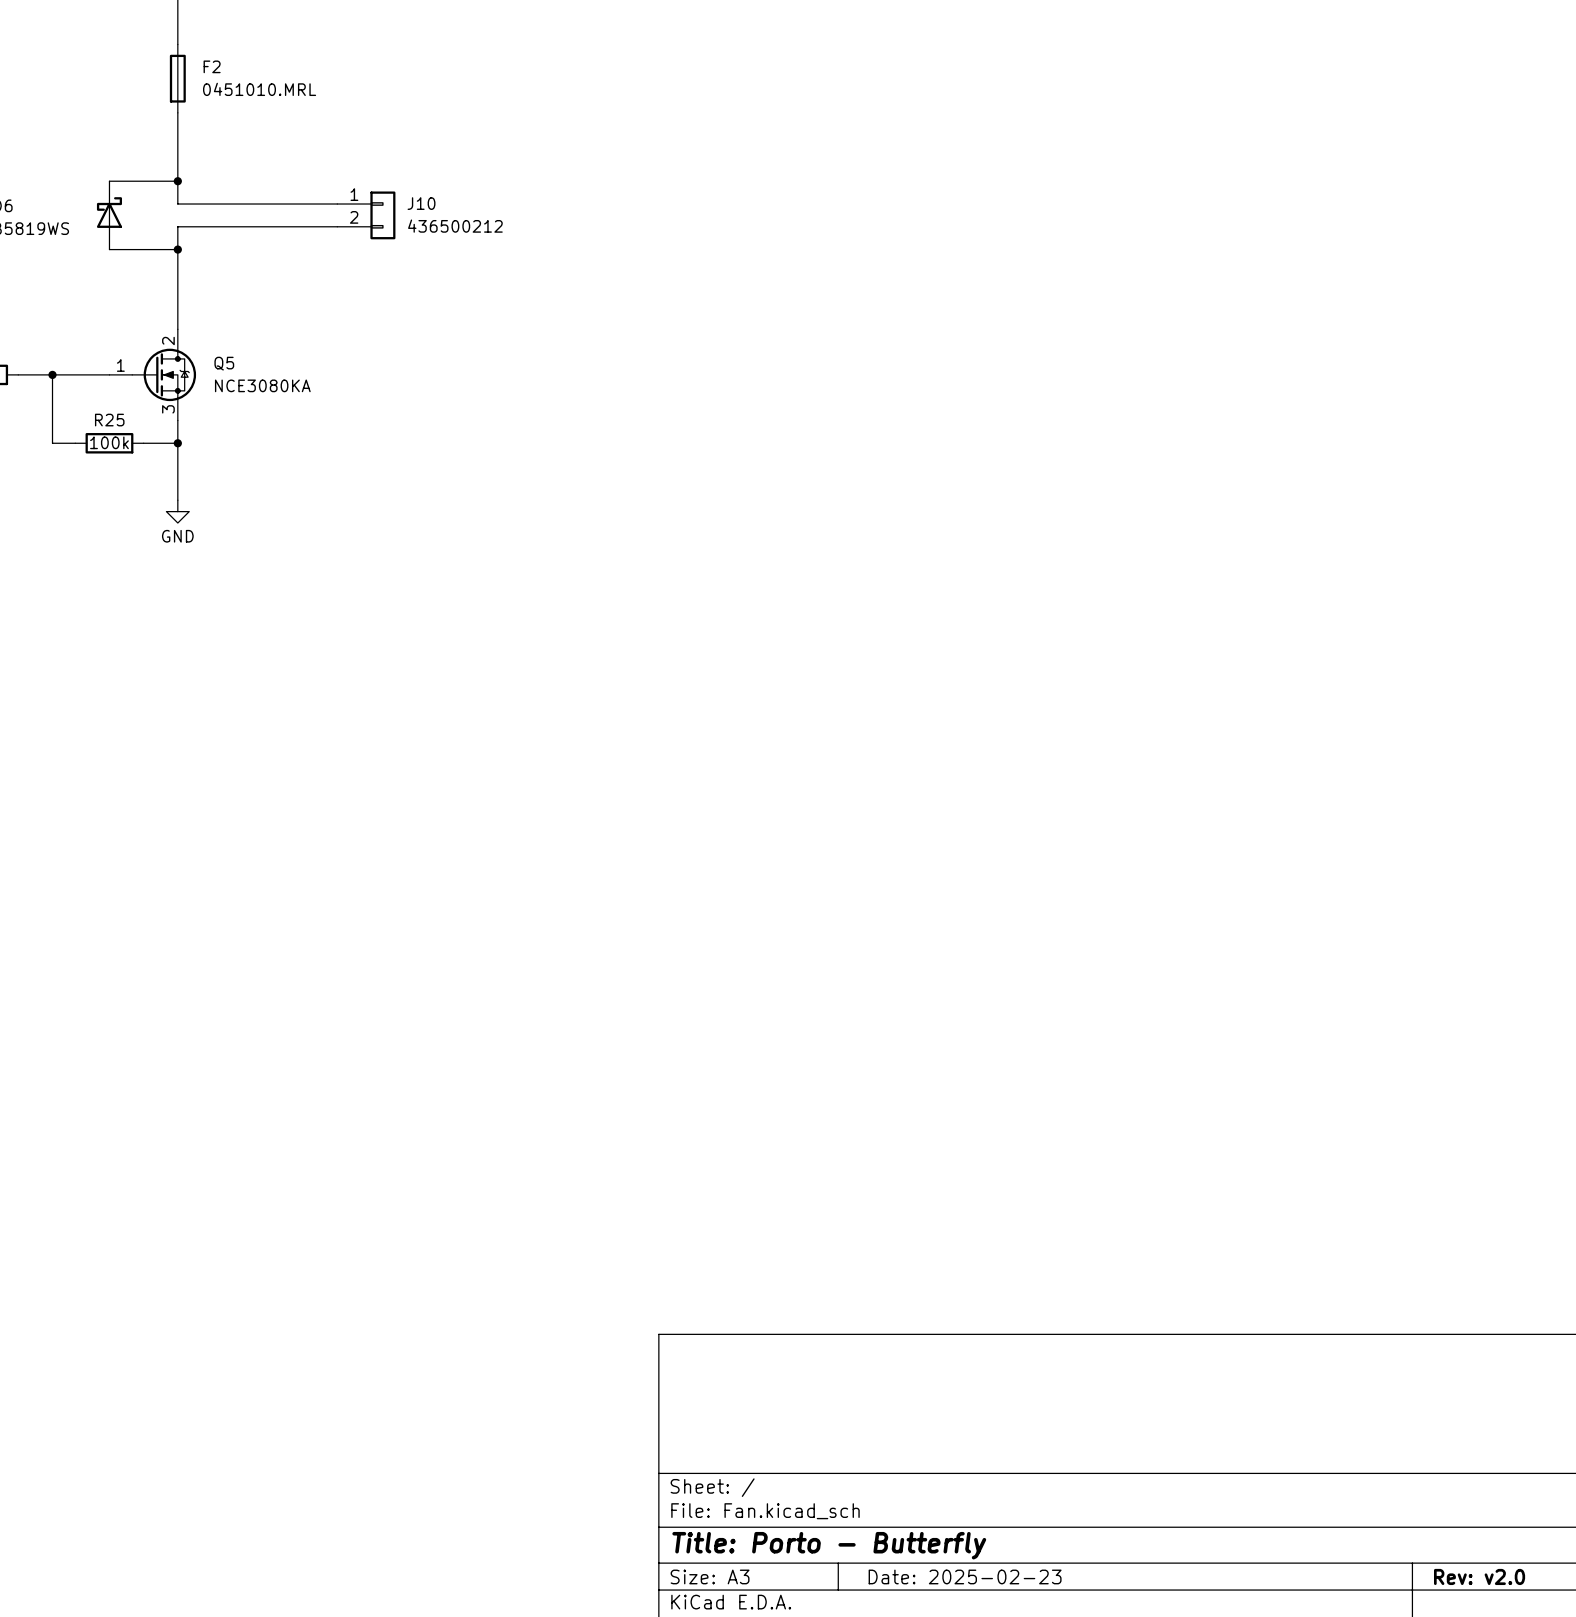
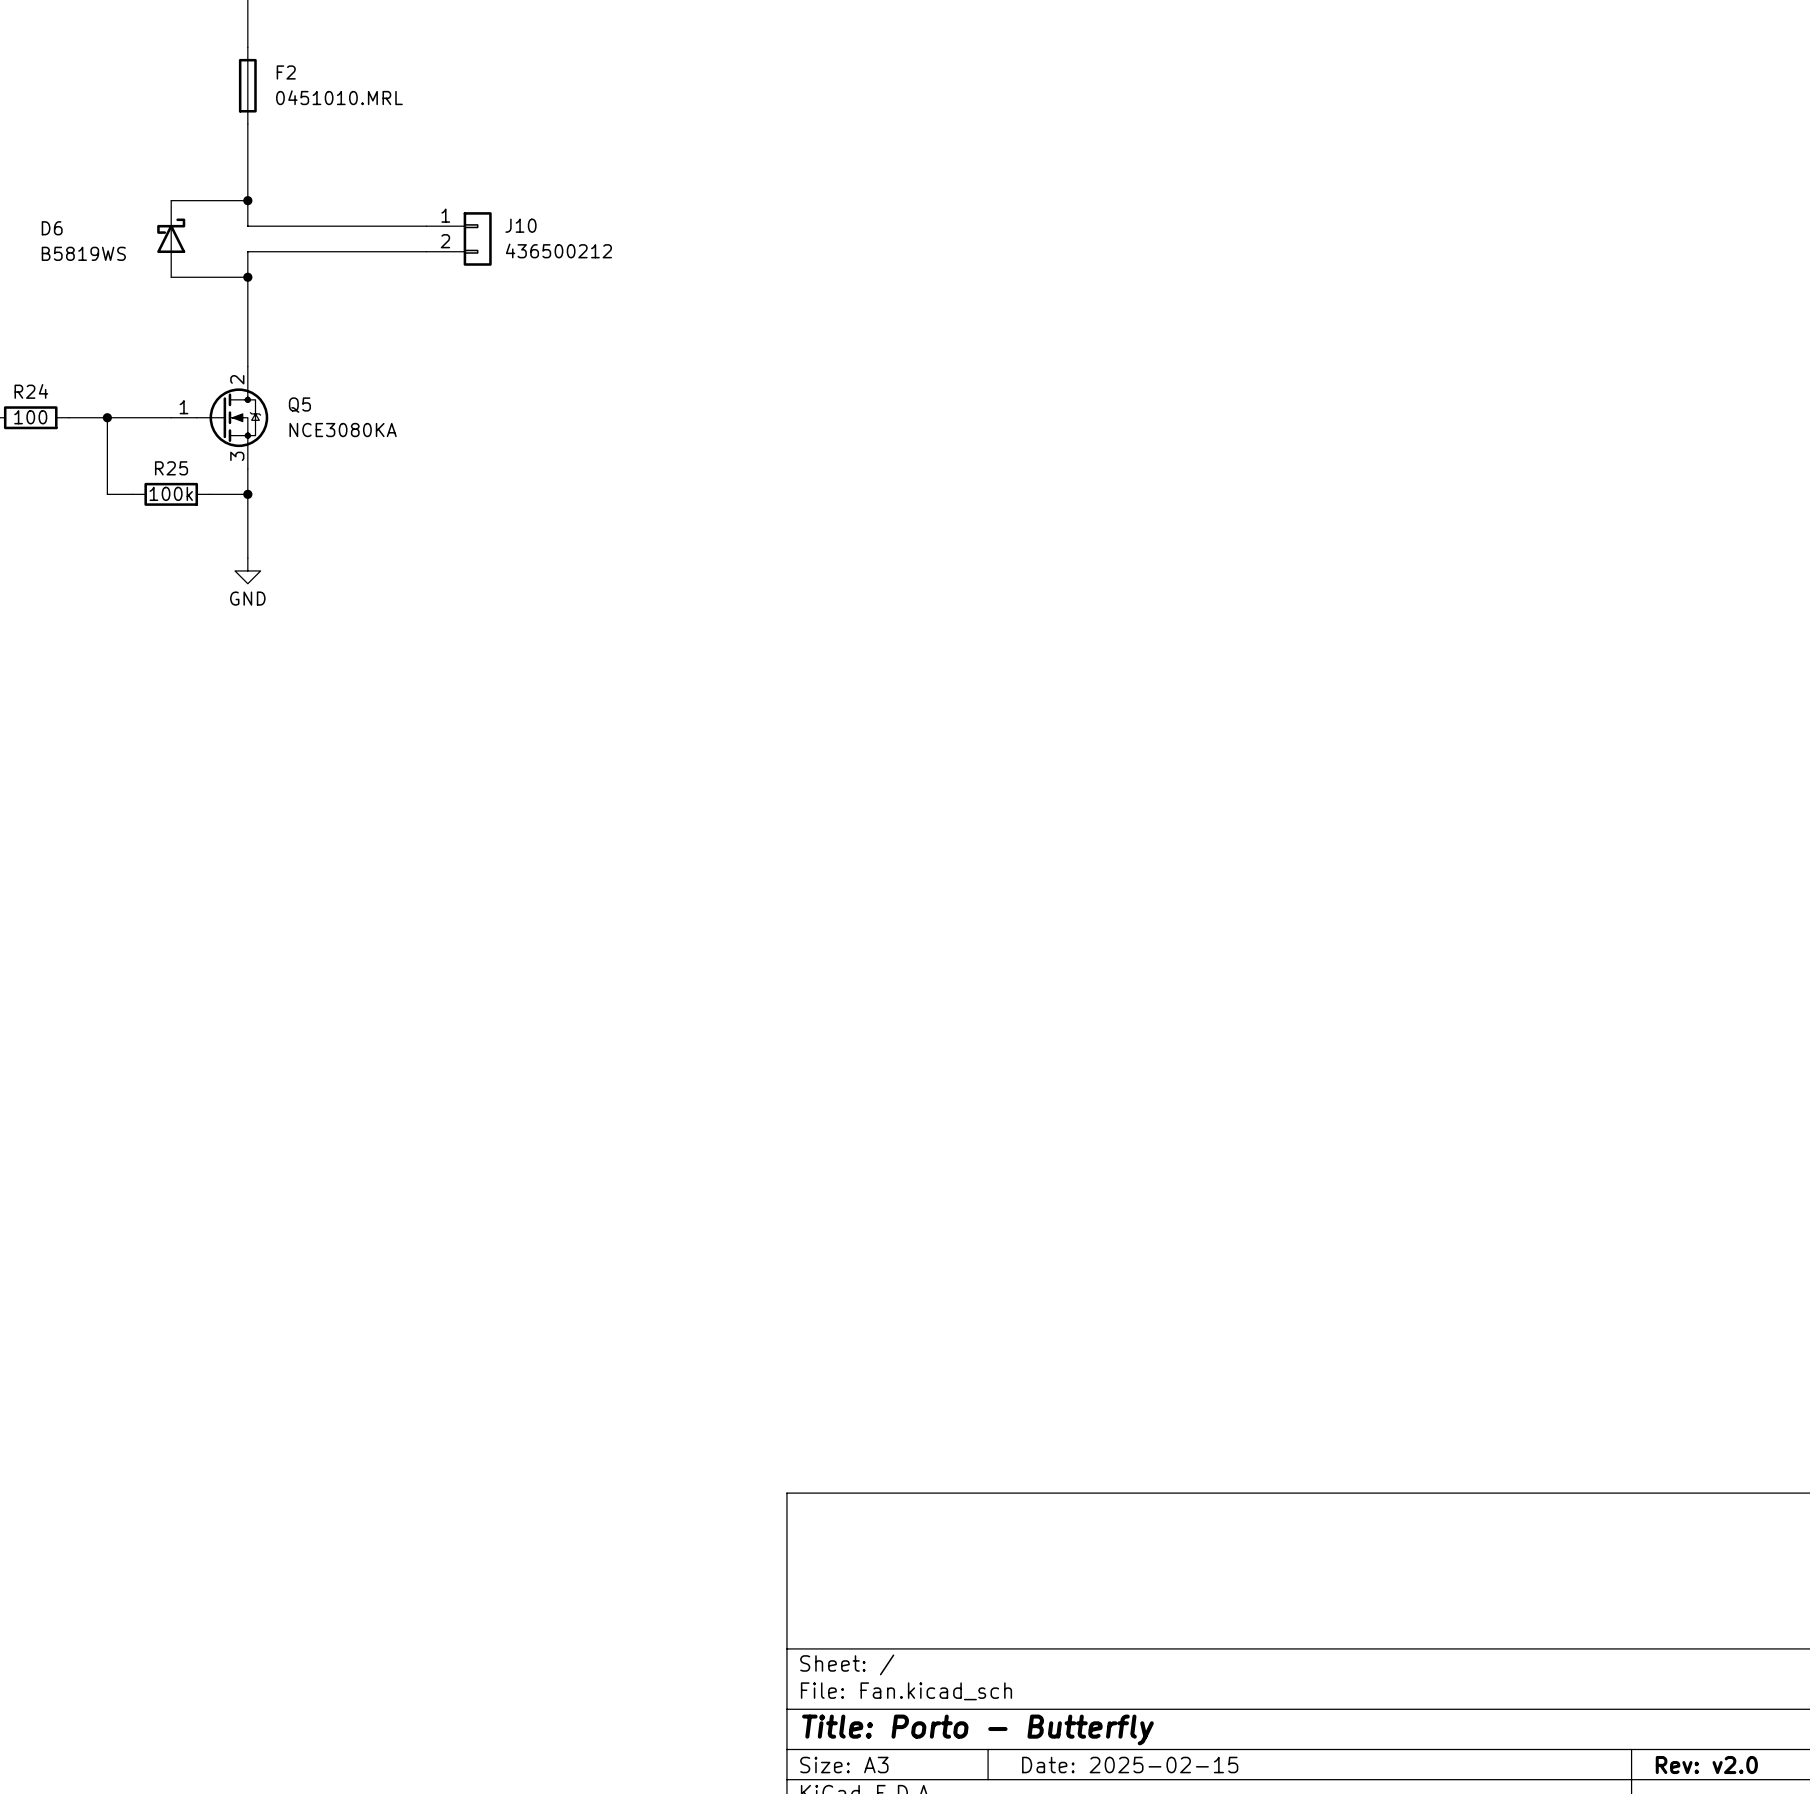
title block: Date: 2025-02-23 (965, 1576) -> Date: 2025-02-15 (1130, 1765)

